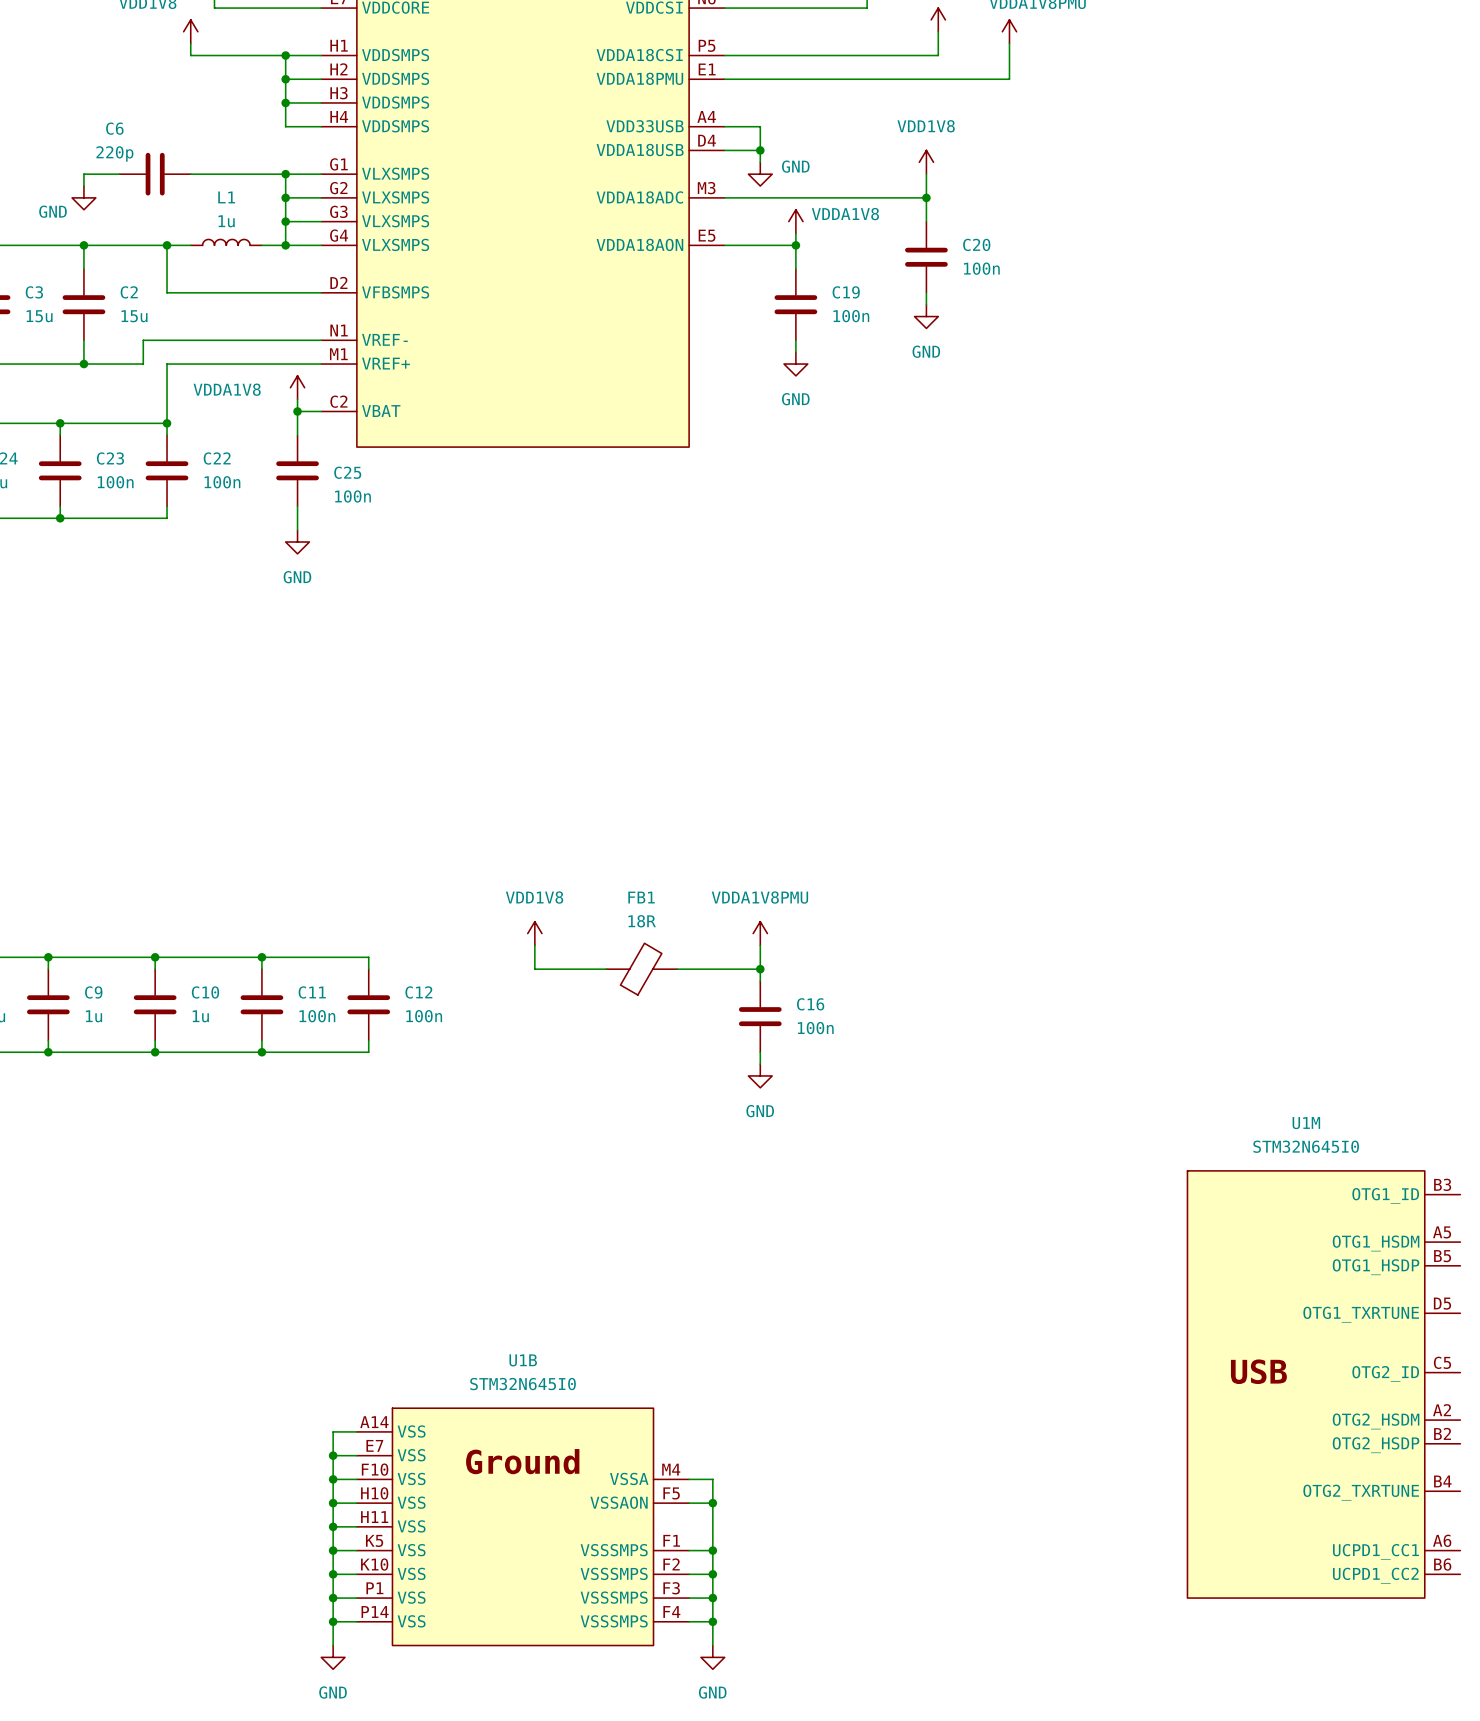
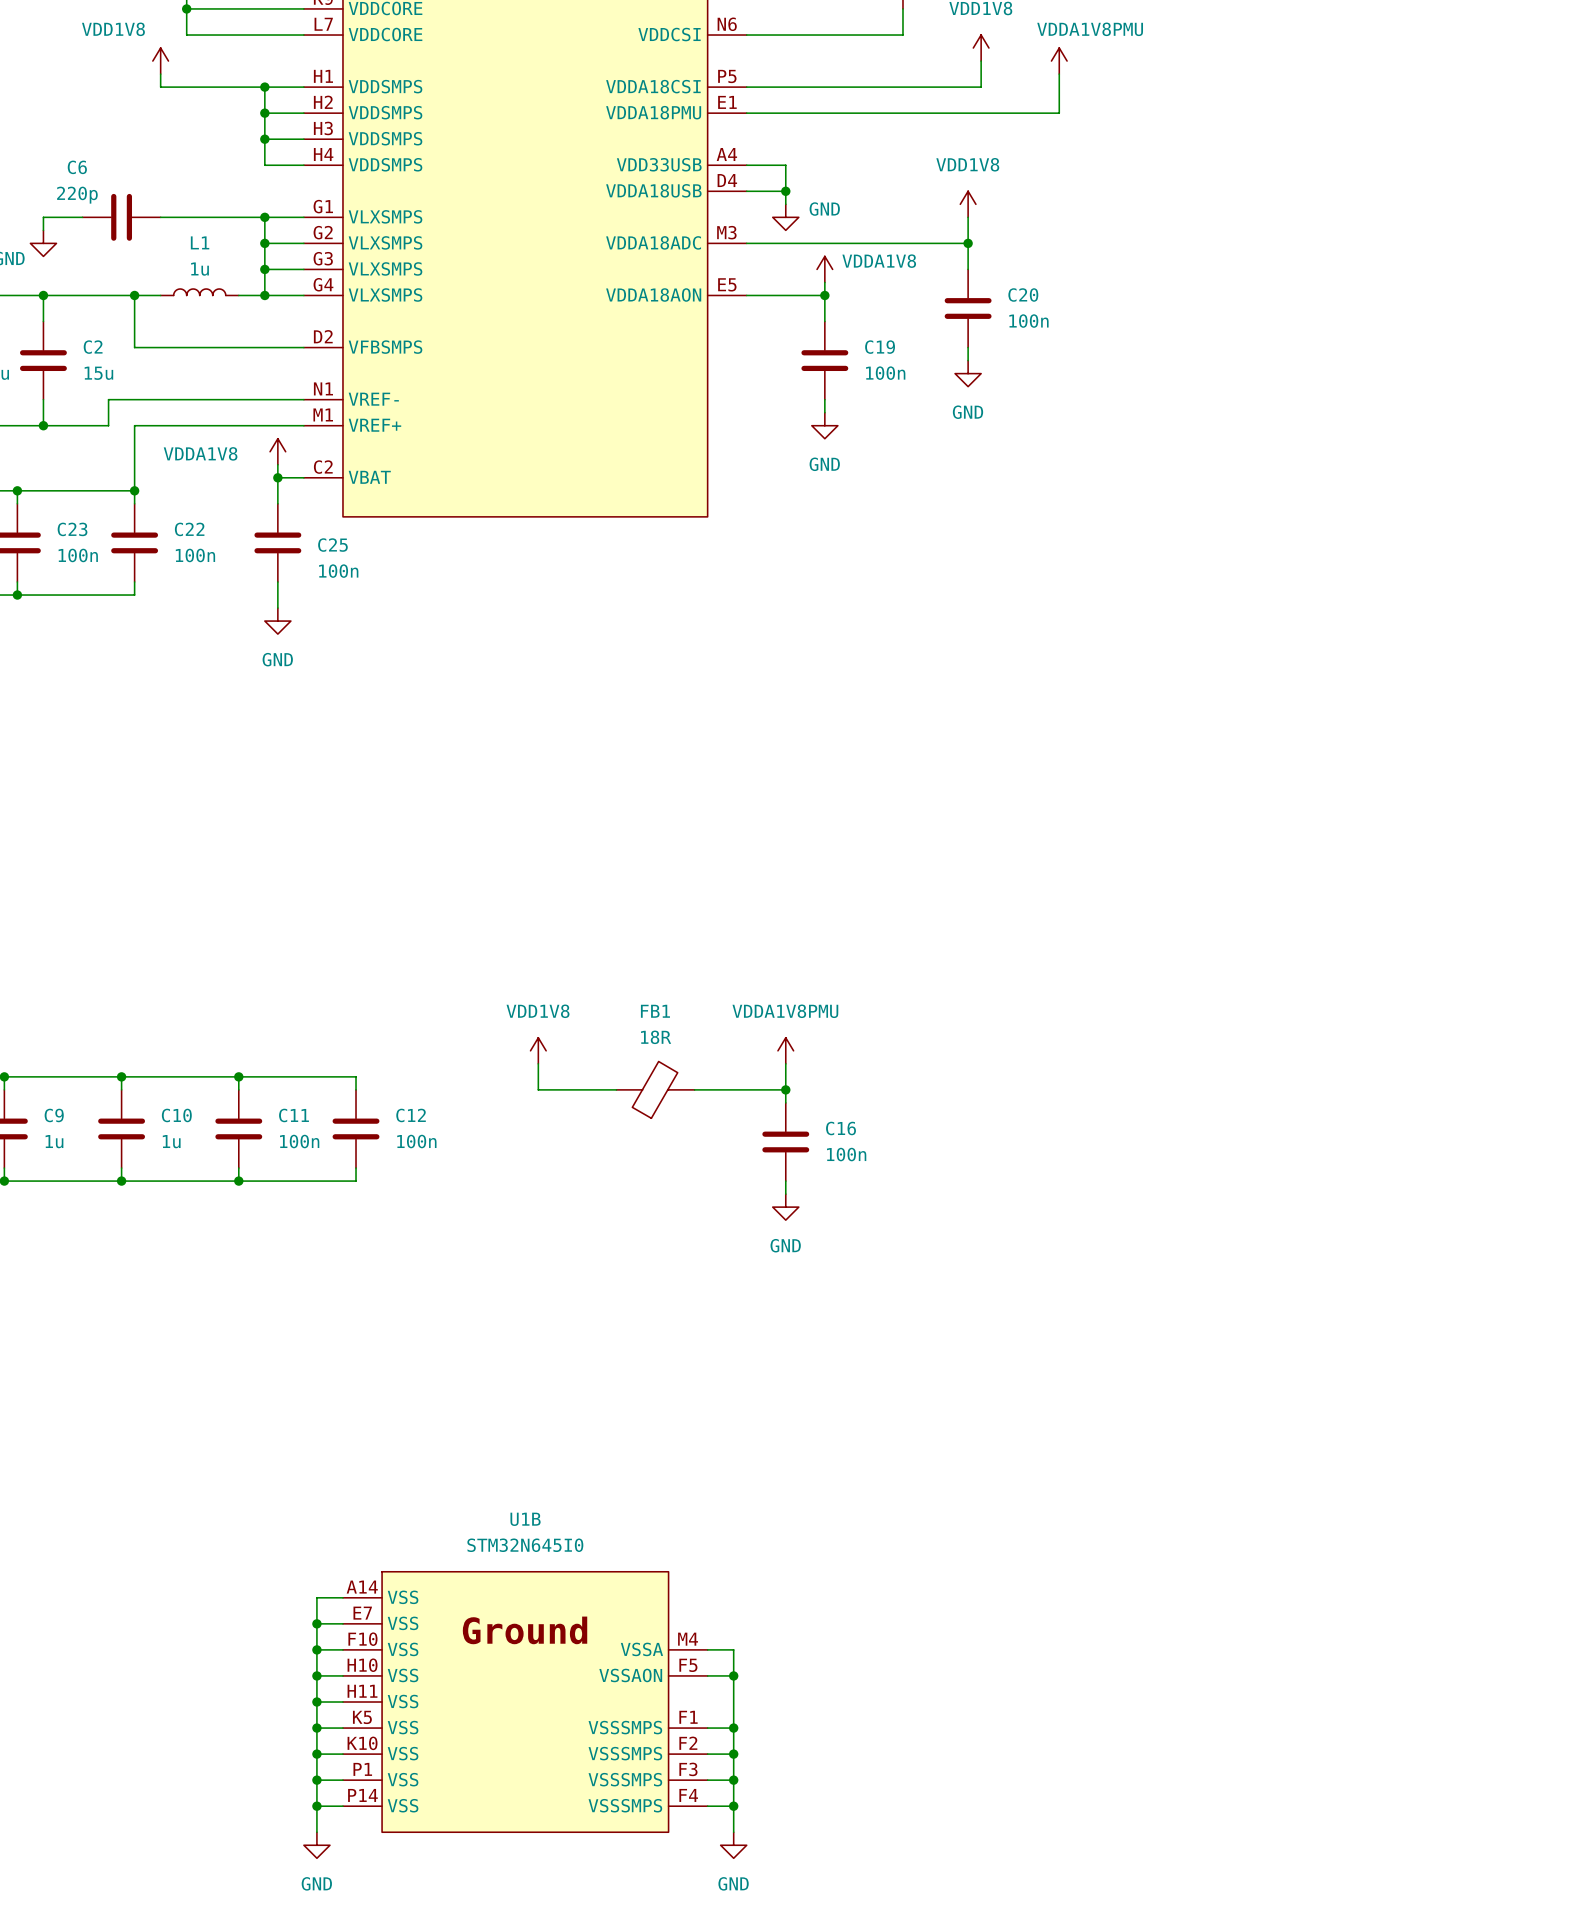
U1M: STM32N645I0 (1323, 1384) -> none

